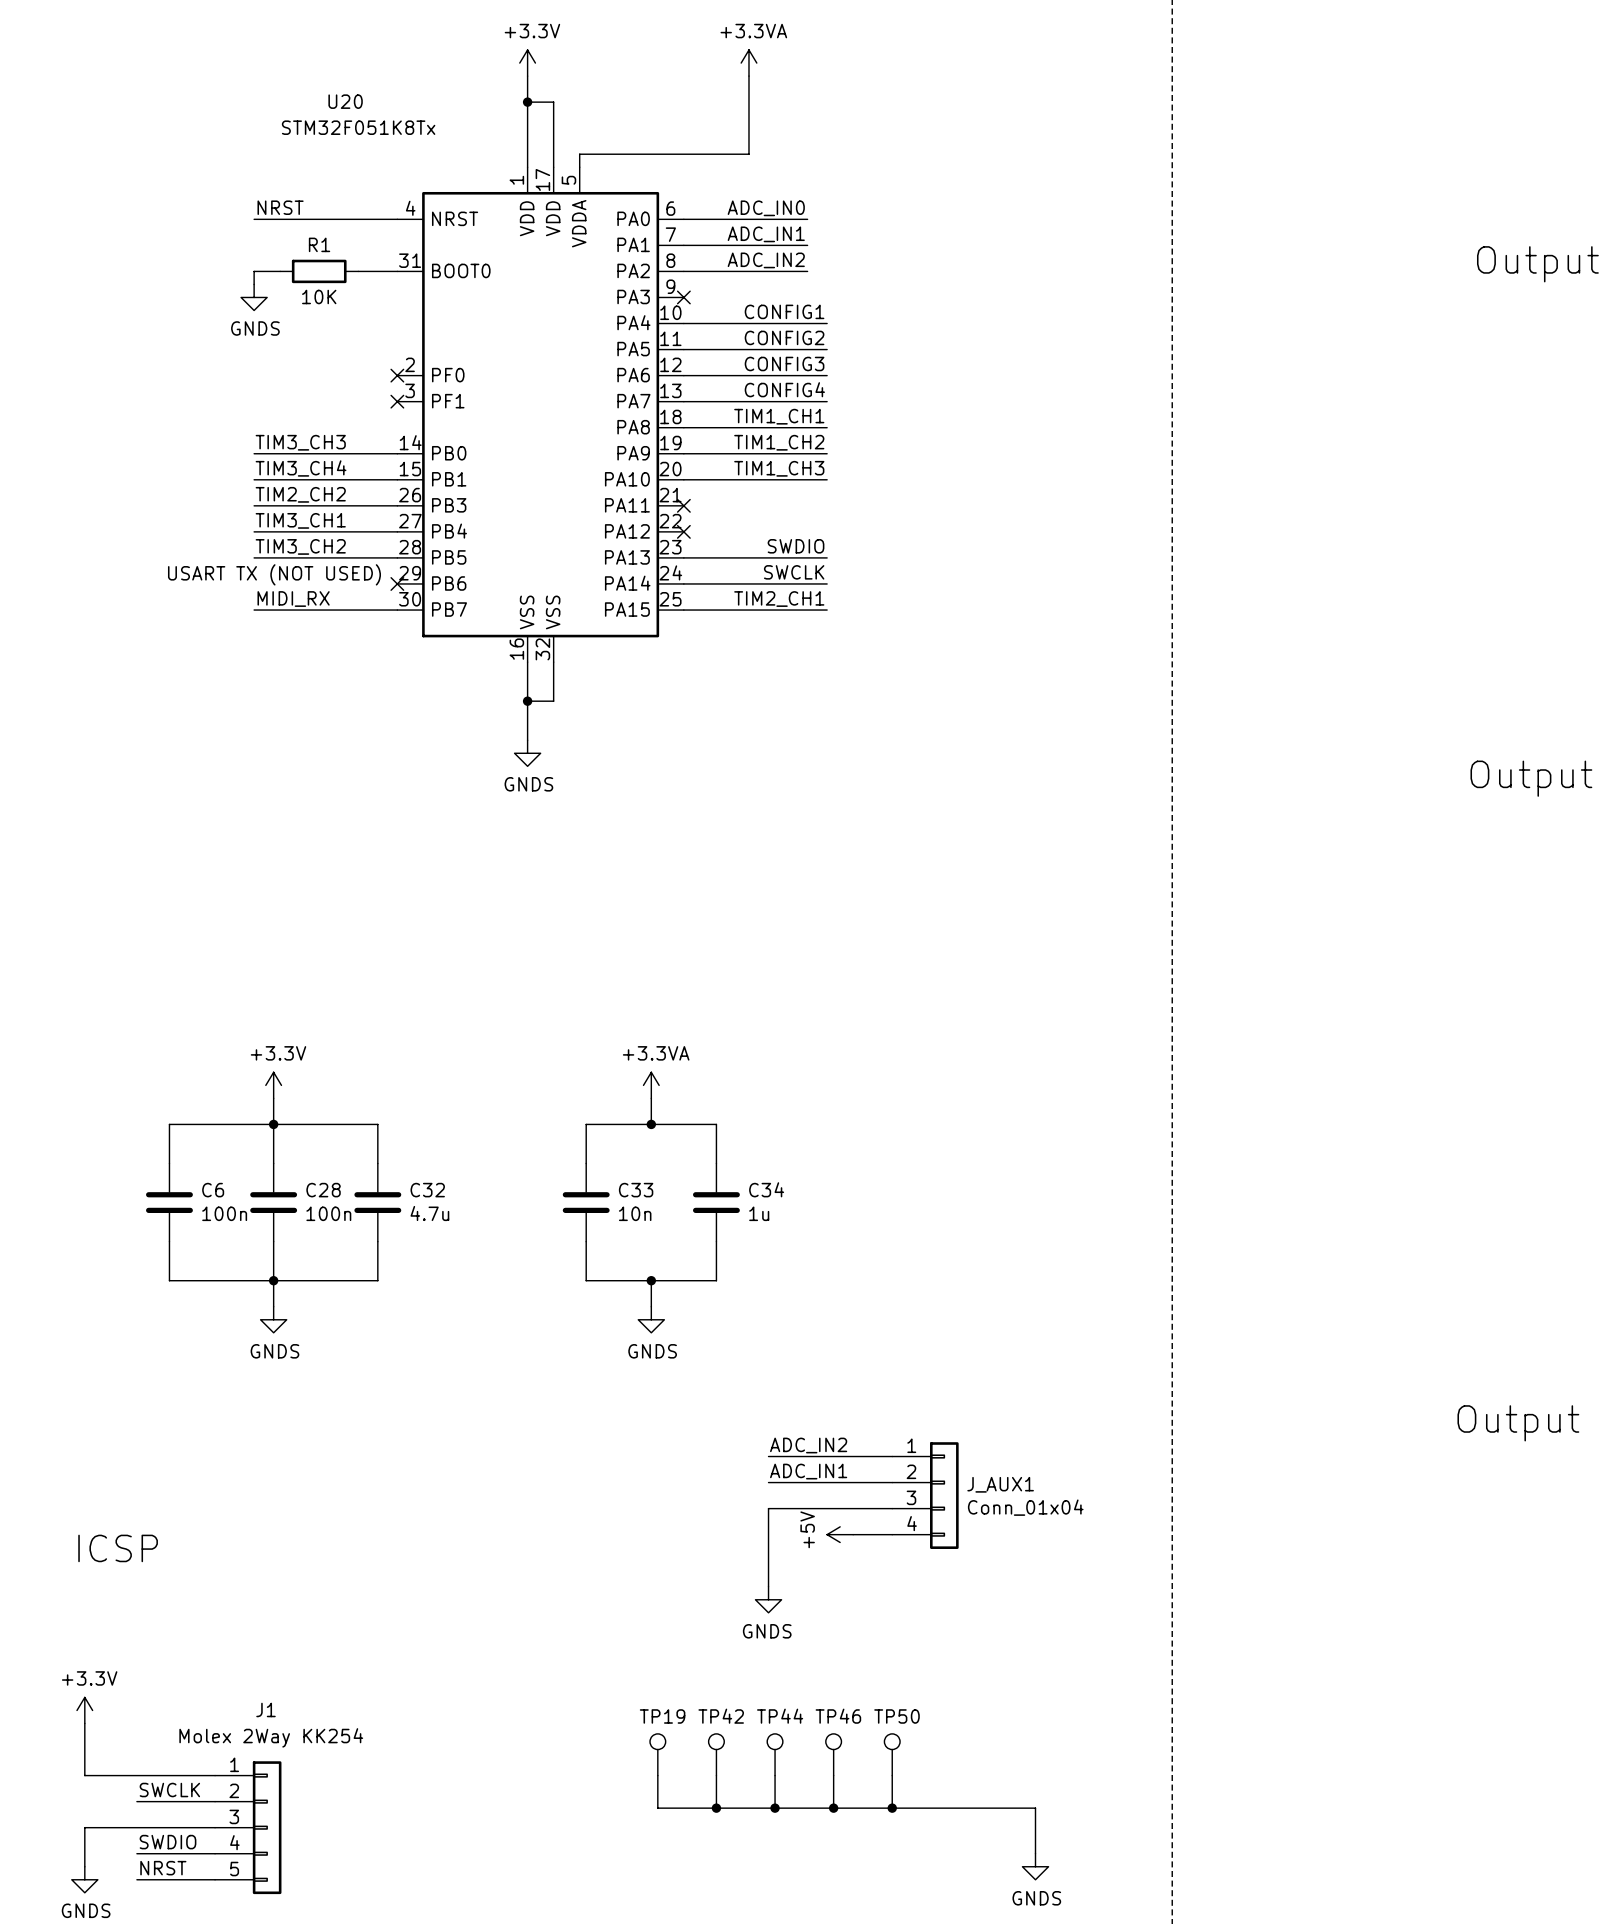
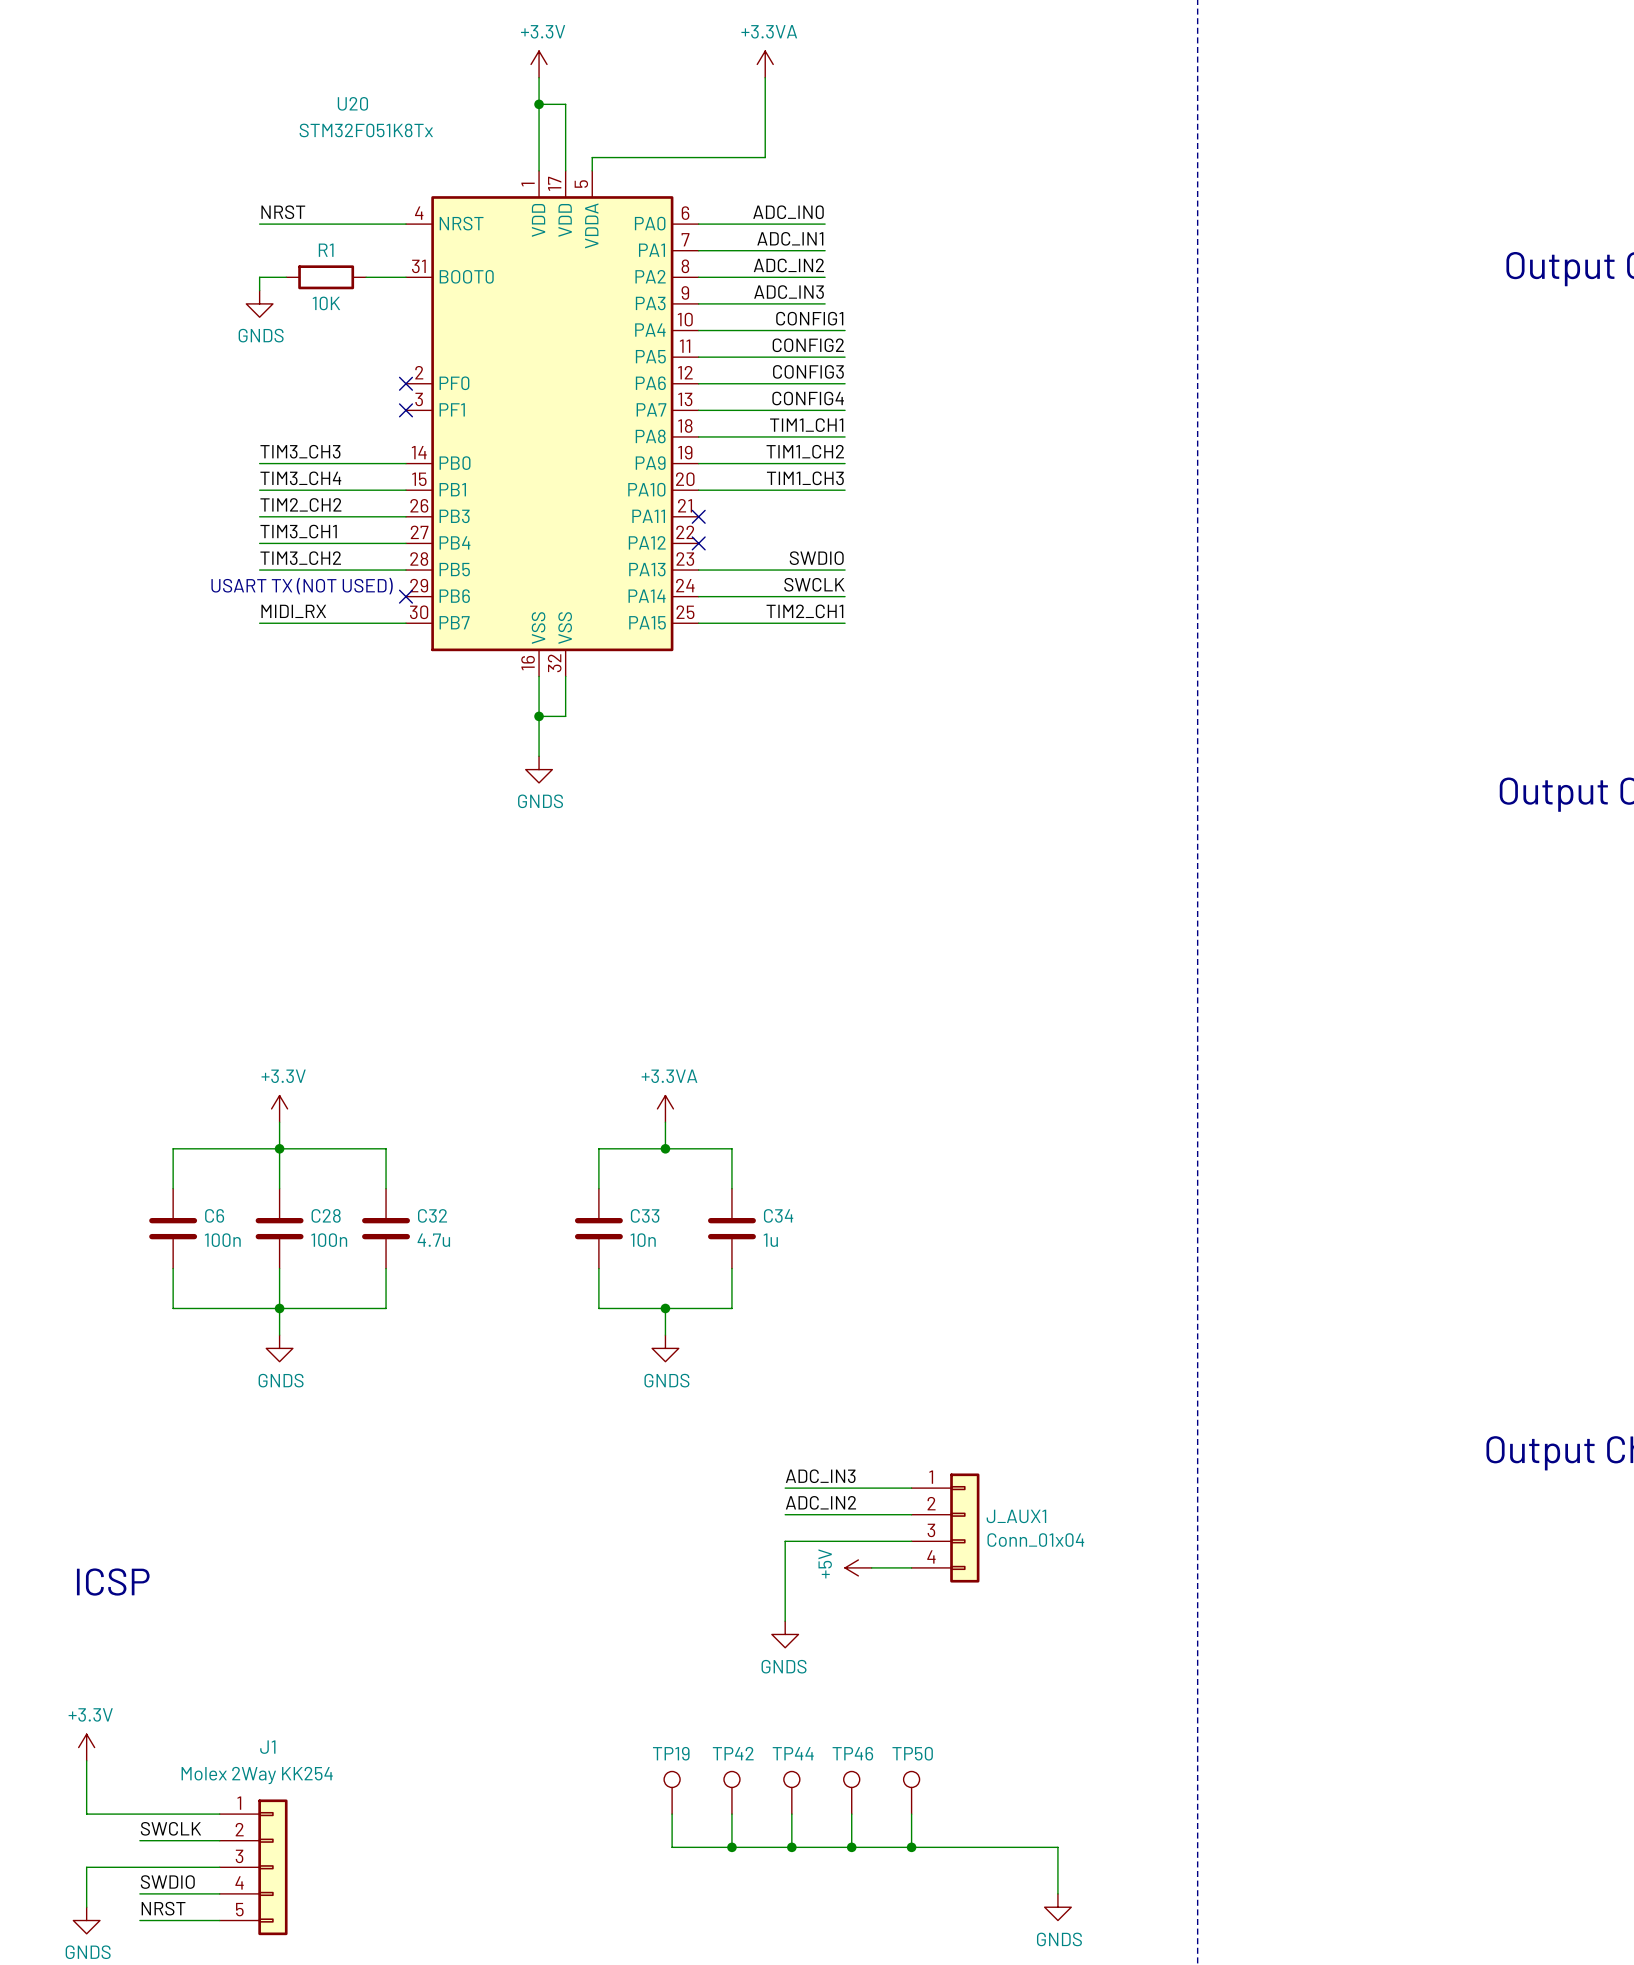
label: none -> ADC_IN3 (789, 292)
wire: none -> (698, 303) (825, 303)
no-connect mark: (683, 297) -> none
label: ADC_IN2 (808, 1445) -> ADC_IN3 (820, 1476)
label: ADC_IN1 (808, 1471) -> ADC_IN2 (820, 1502)

